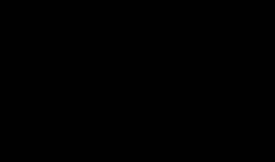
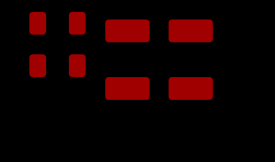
part: none -> (57, 23)
part: none -> (159, 30)
part: none -> (57, 65)
part: none -> (159, 88)

